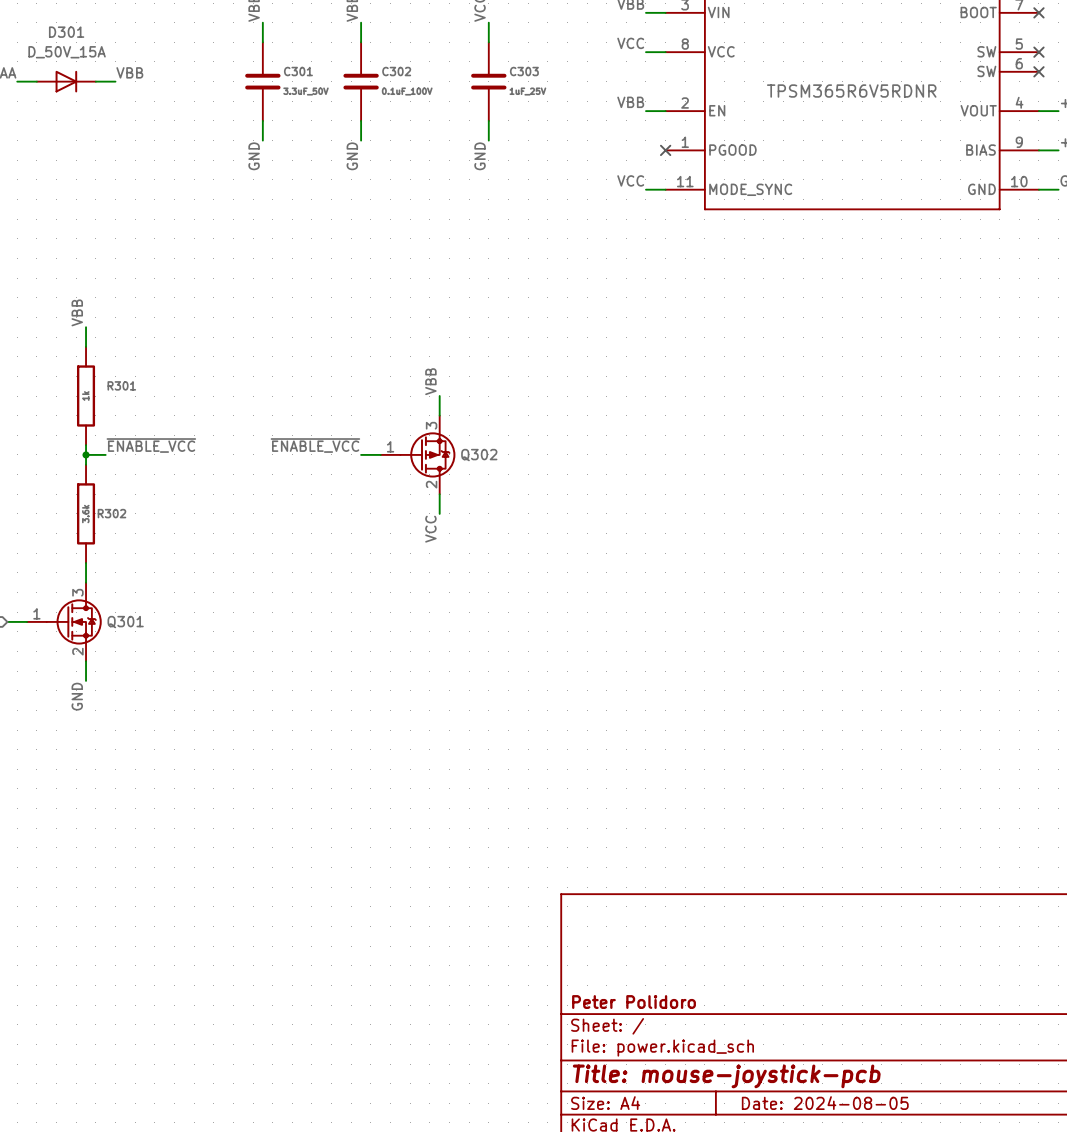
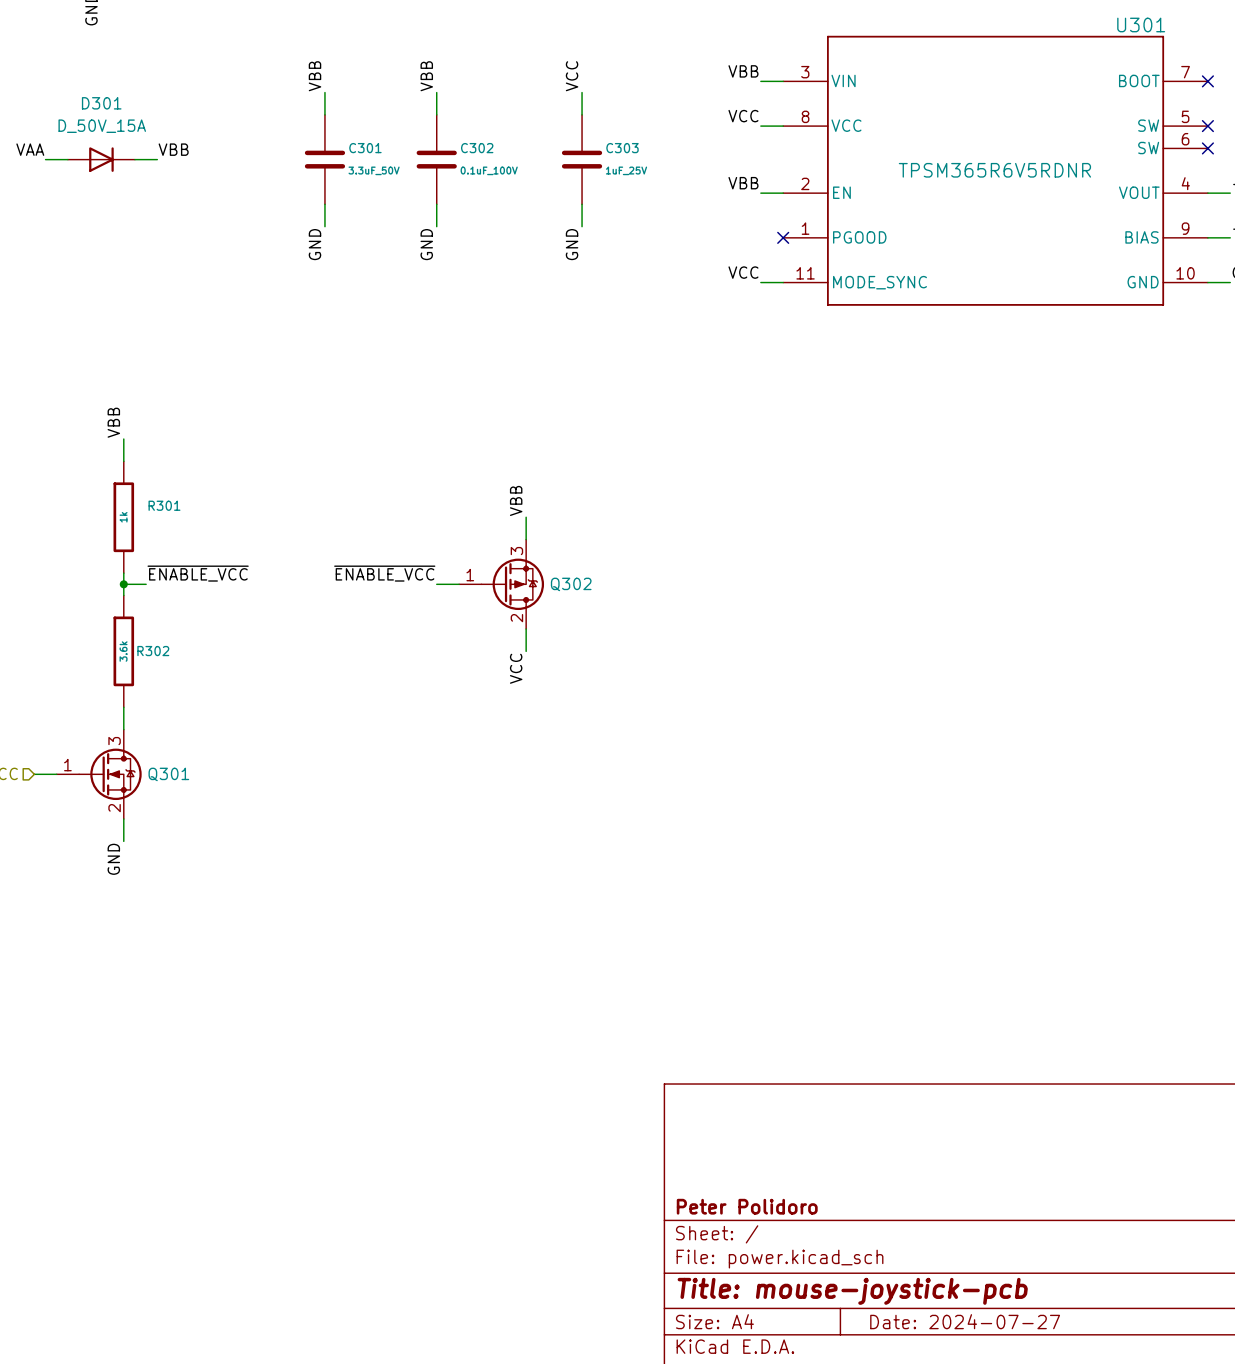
title block: Date: 2024-08-05 (825, 1103) -> Date: 2024-07-27 (965, 1321)

